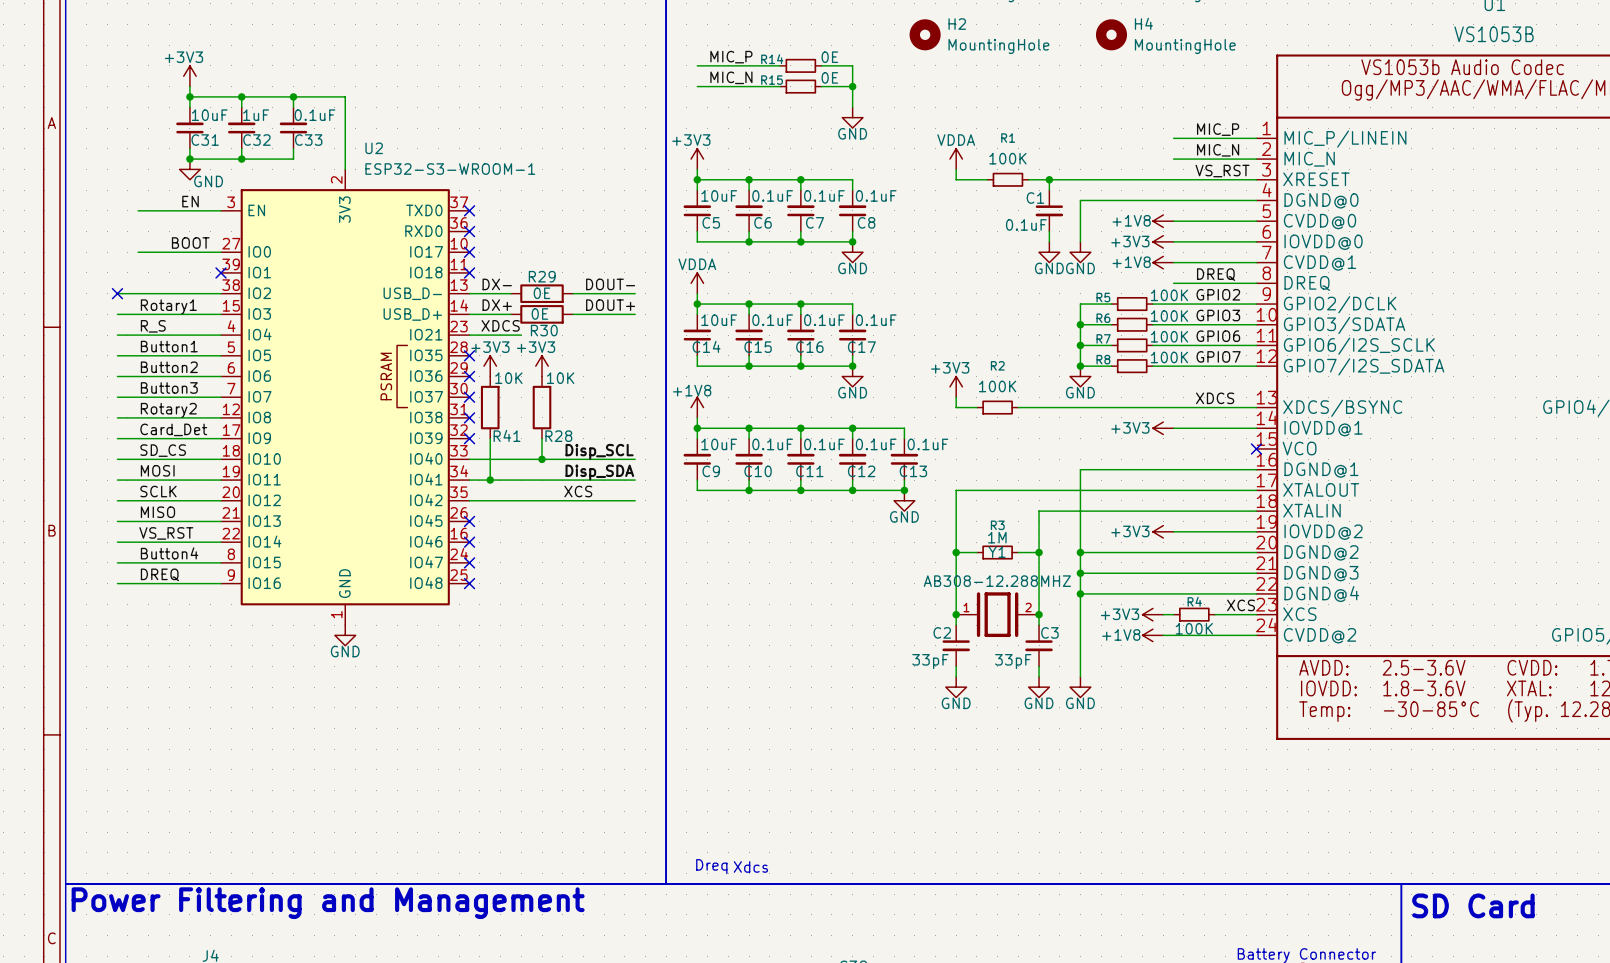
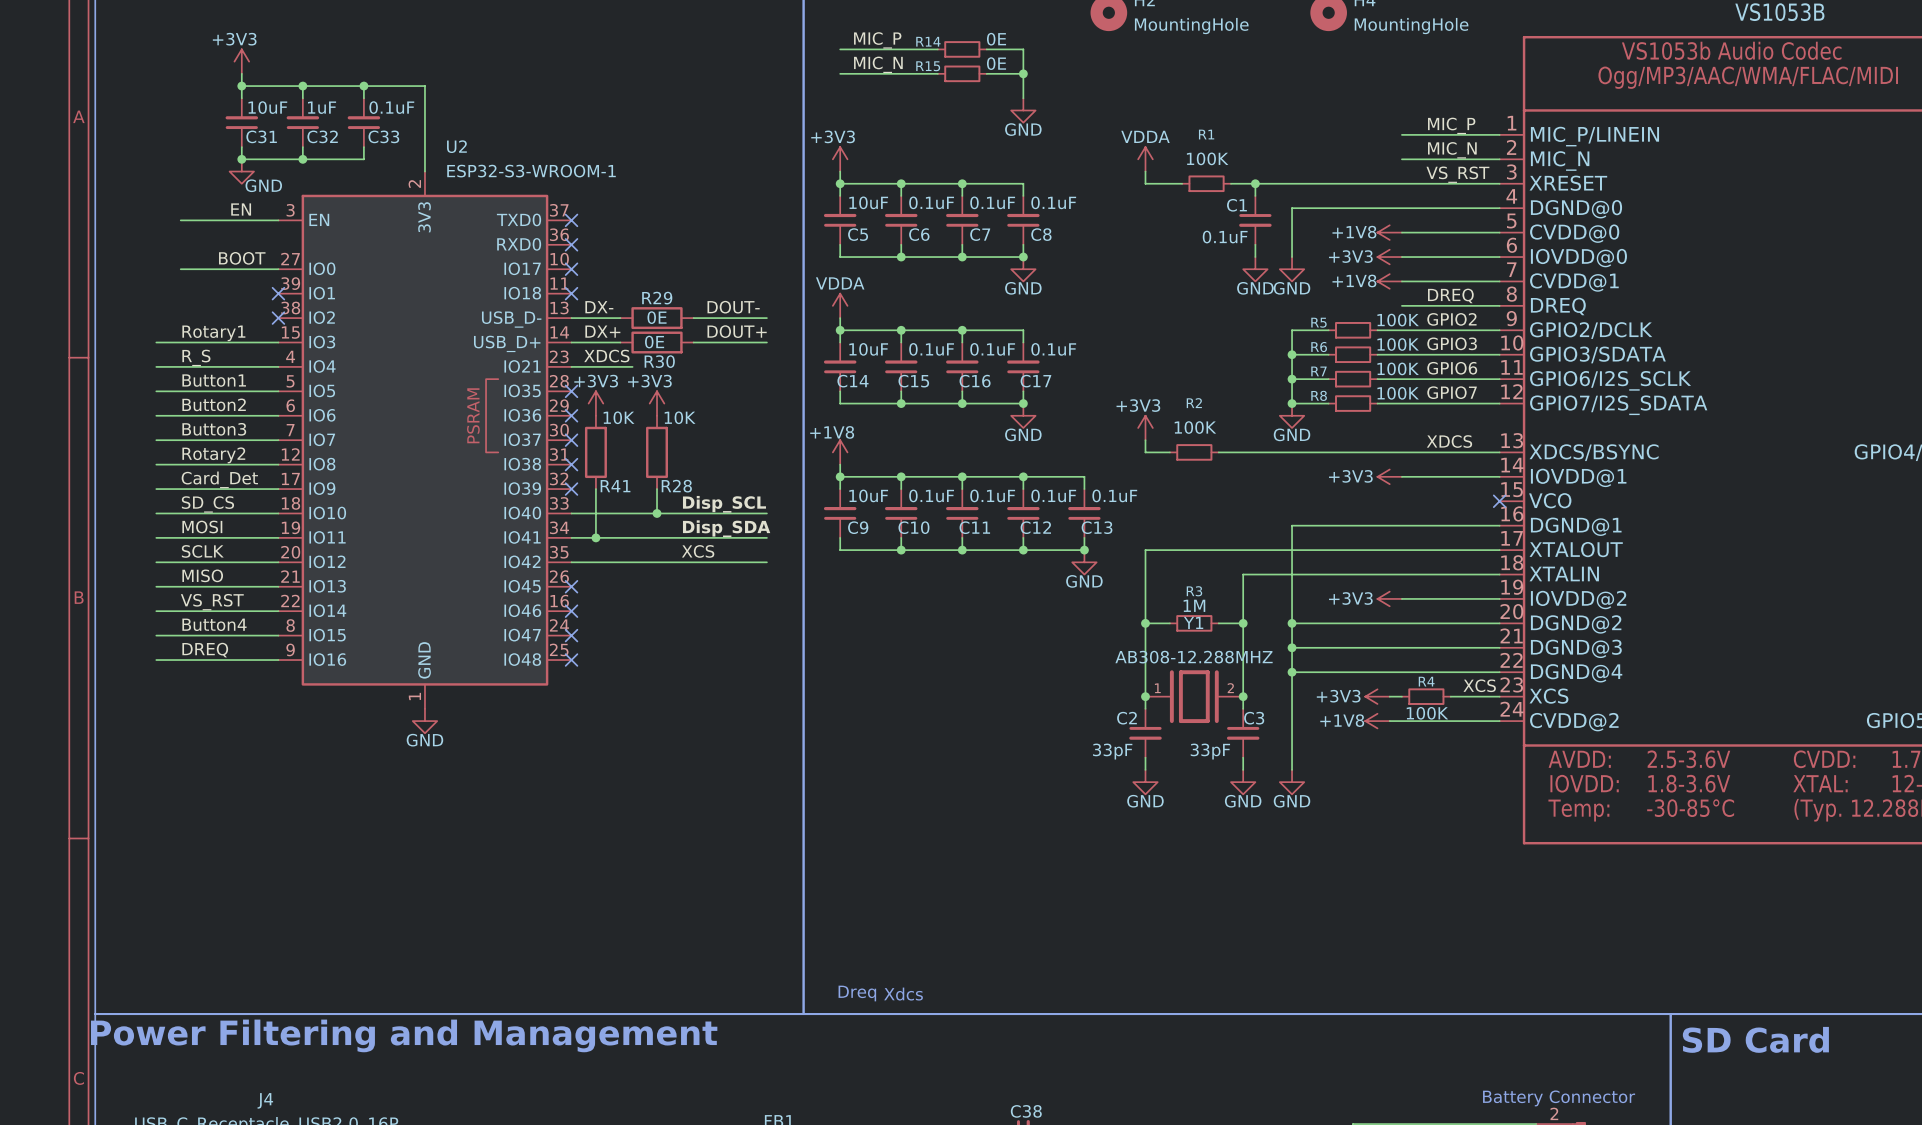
wire: (117, 293) (221, 293) -> none
no-connect mark: (117, 293) -> none
no-connect mark: none -> (278, 318)

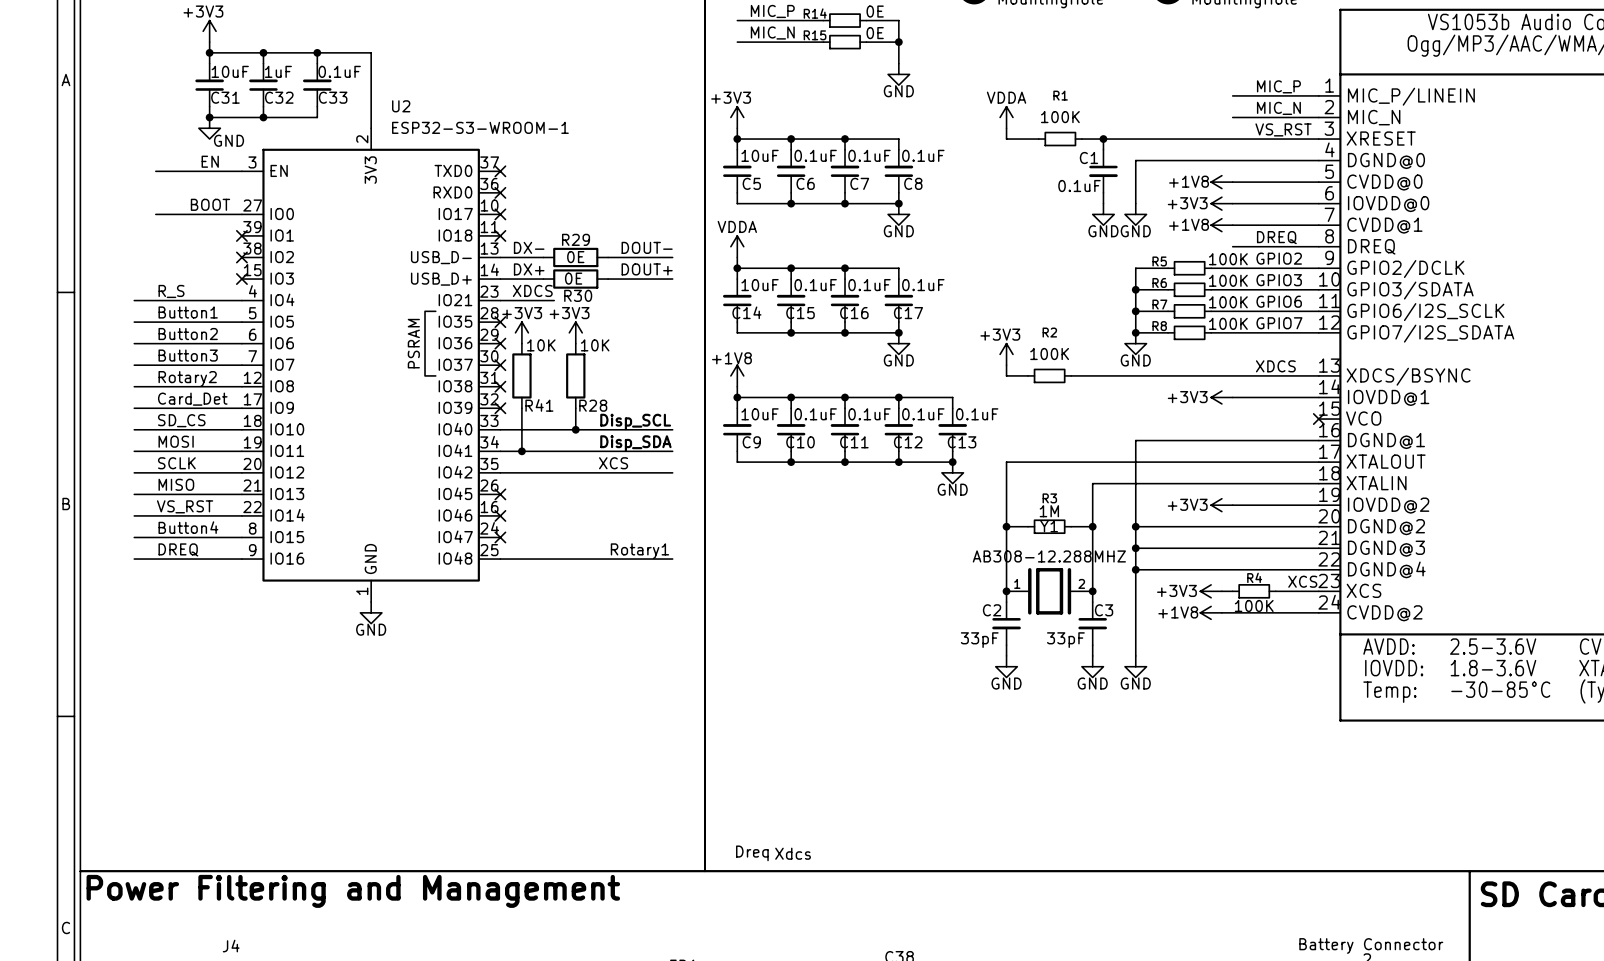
label: Rotary1 (213, 333) -> none
wire: (156, 342) (278, 342) -> none
no-connect mark: none -> (241, 279)
label: none -> Rotary1 (639, 551)
wire: none -> (500, 559) (672, 559)
no-connect mark: (571, 660) -> none

